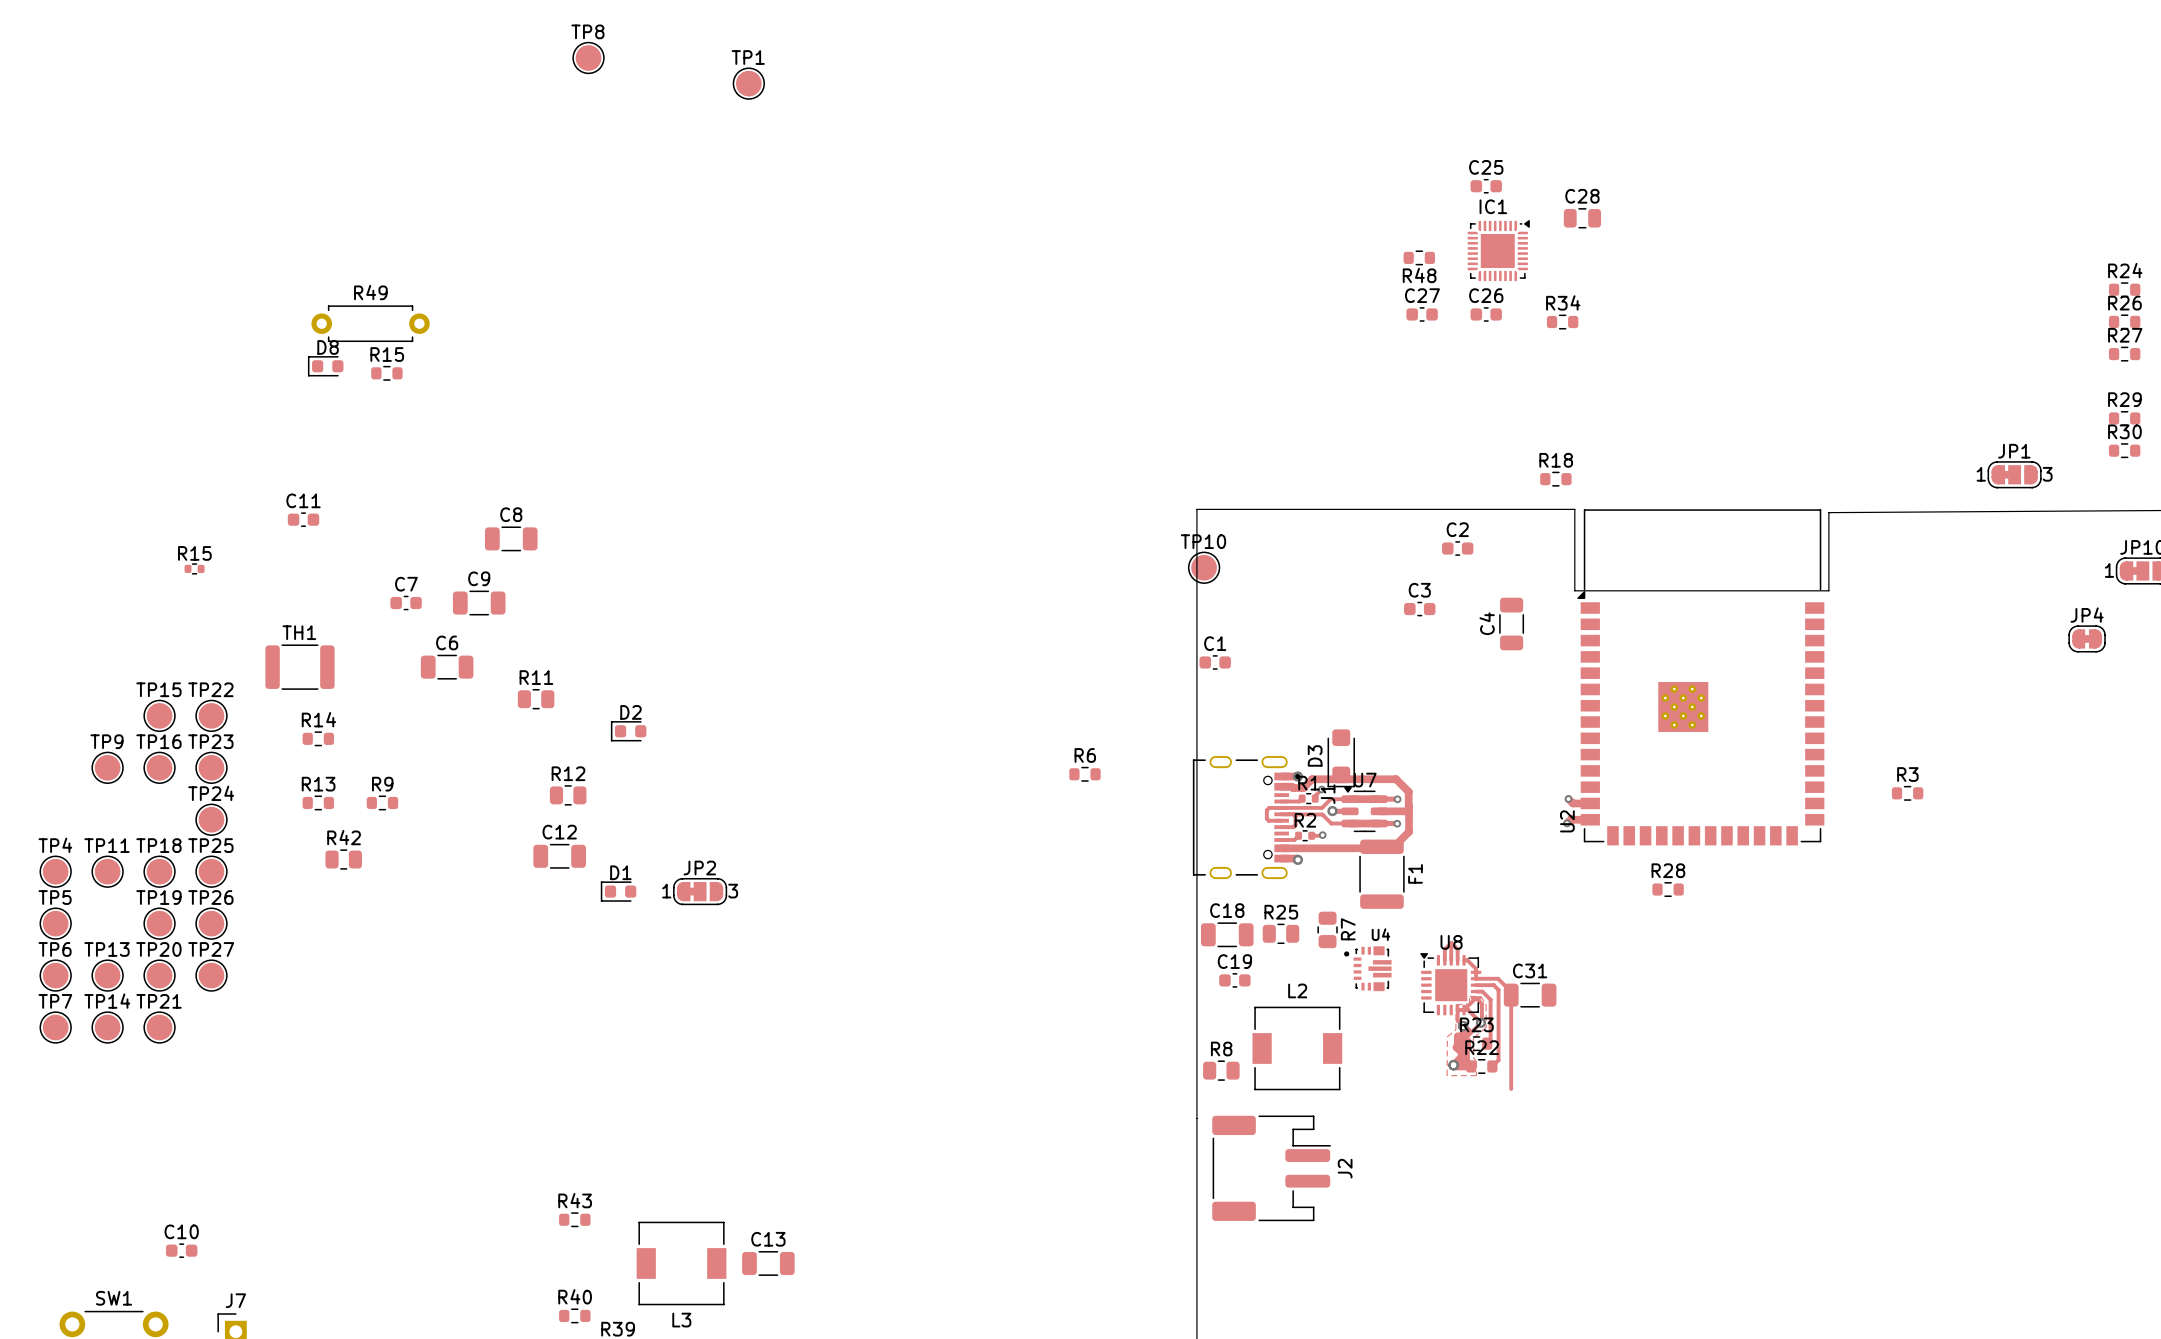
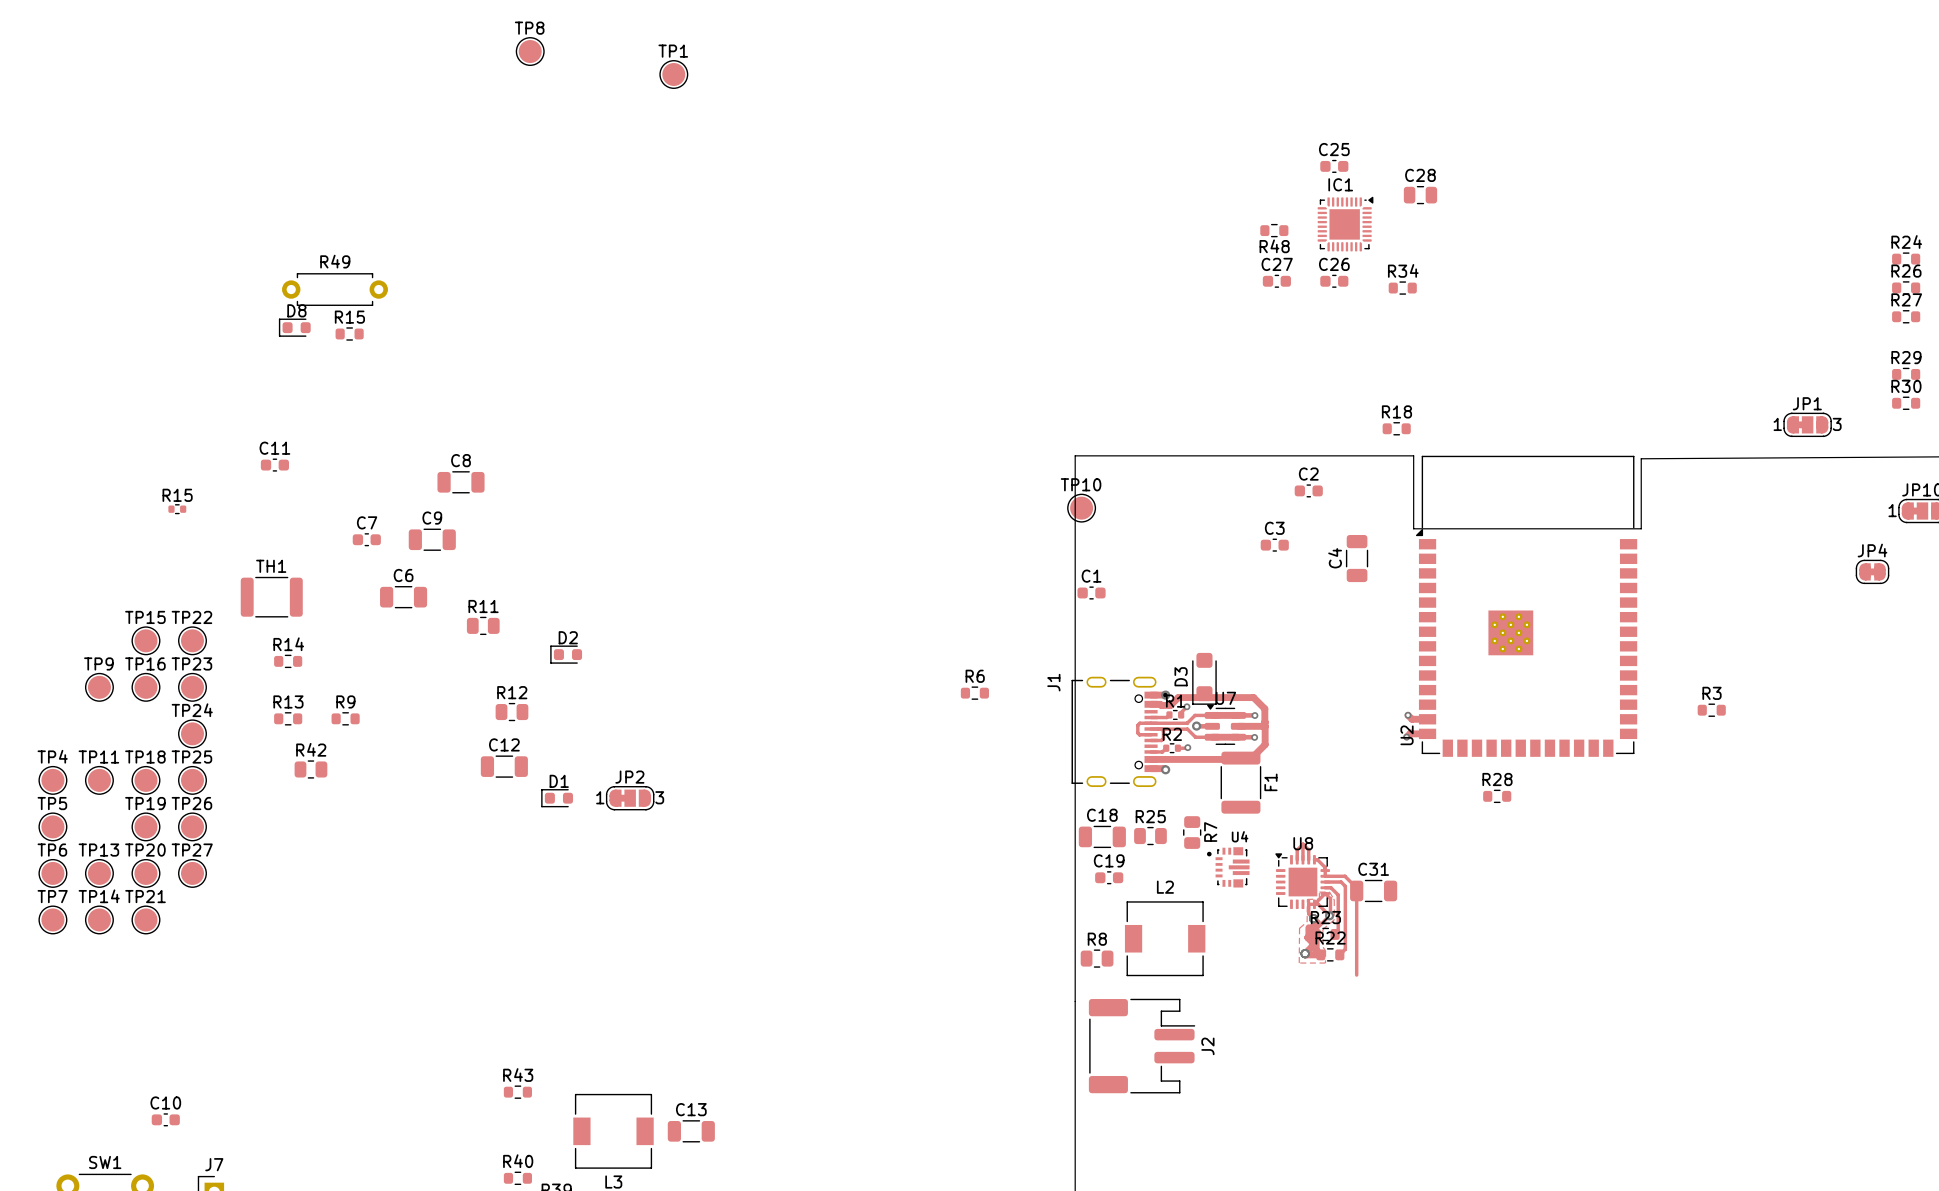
J1 name position: J1 (1328, 794) -> J1 (1053, 682)

